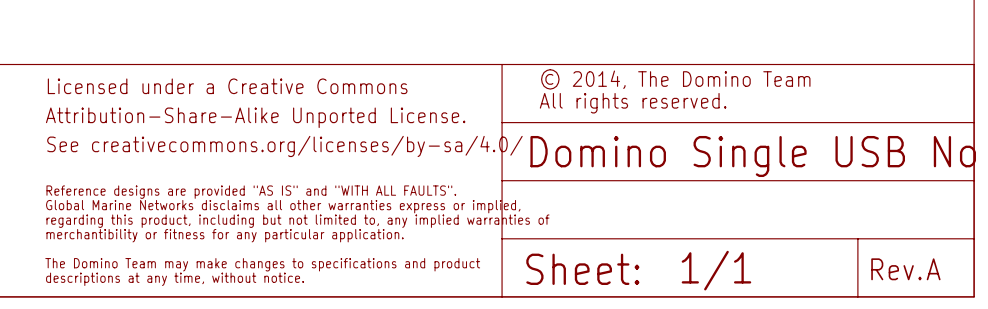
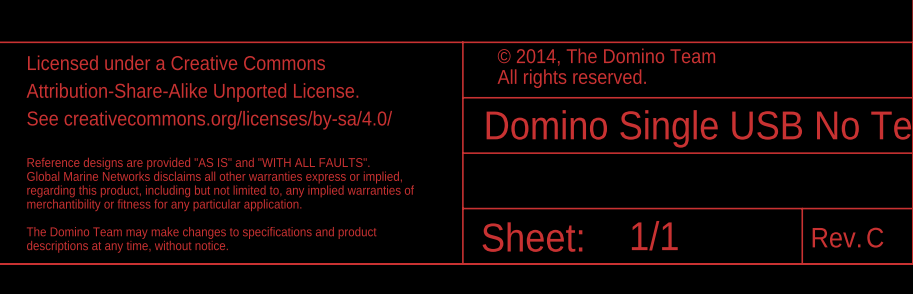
text: A (933, 269) -> C (875, 237)

